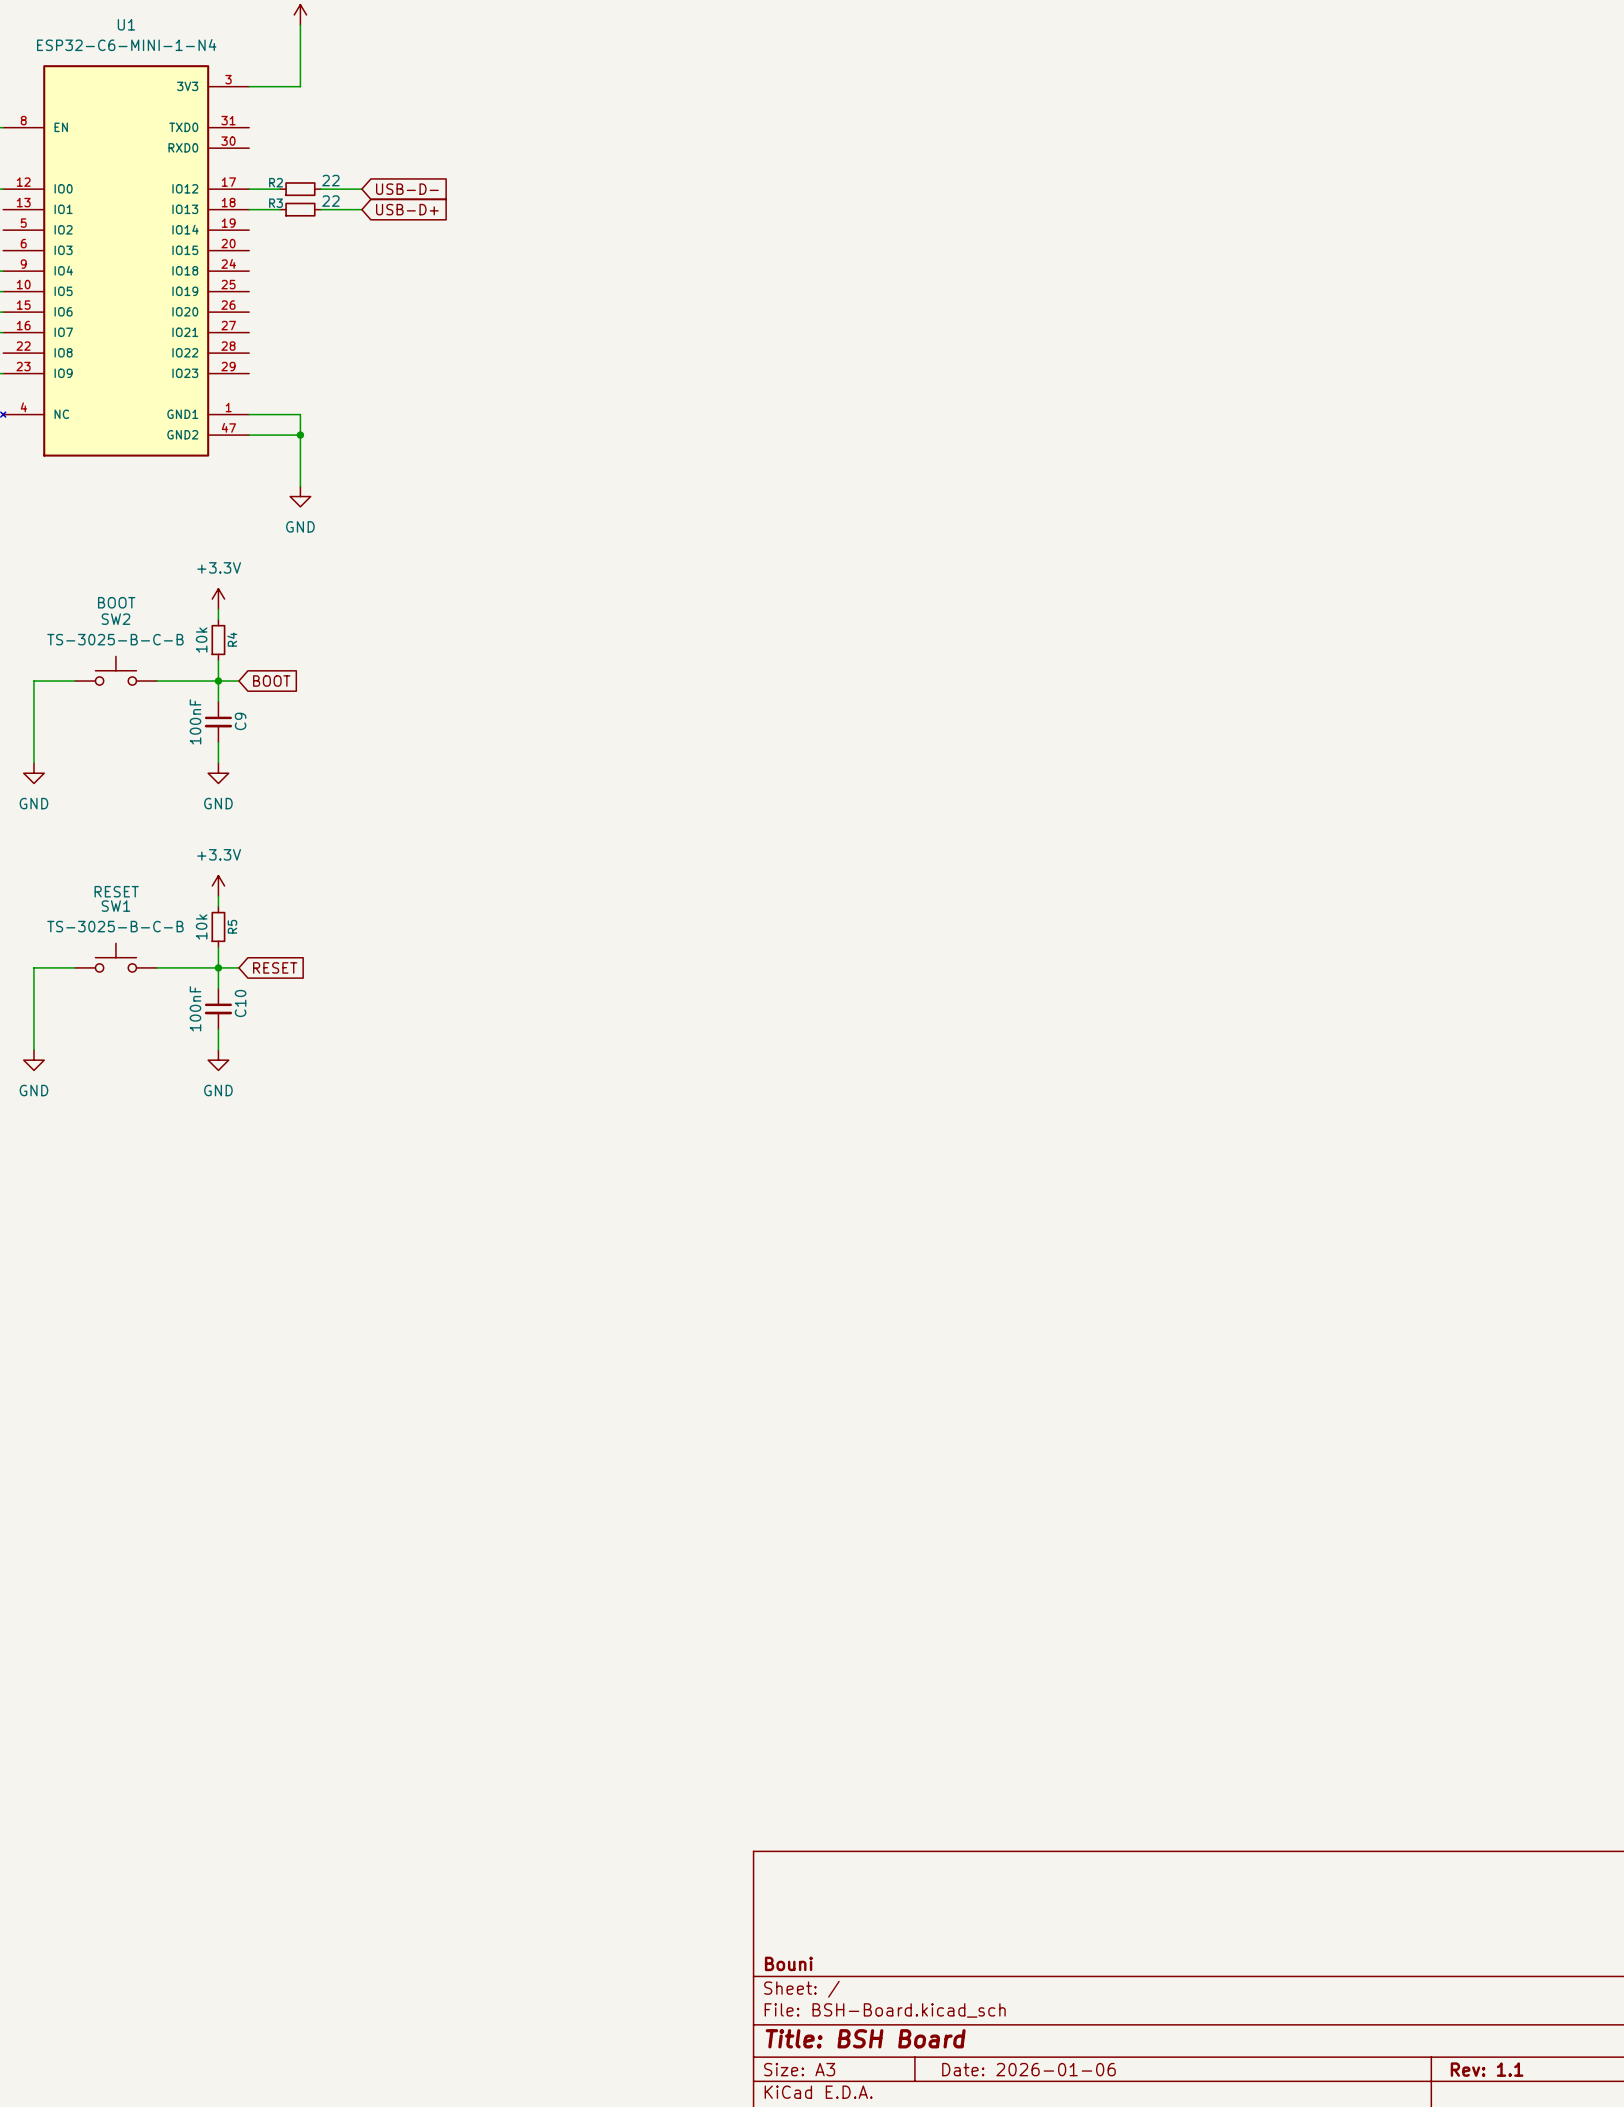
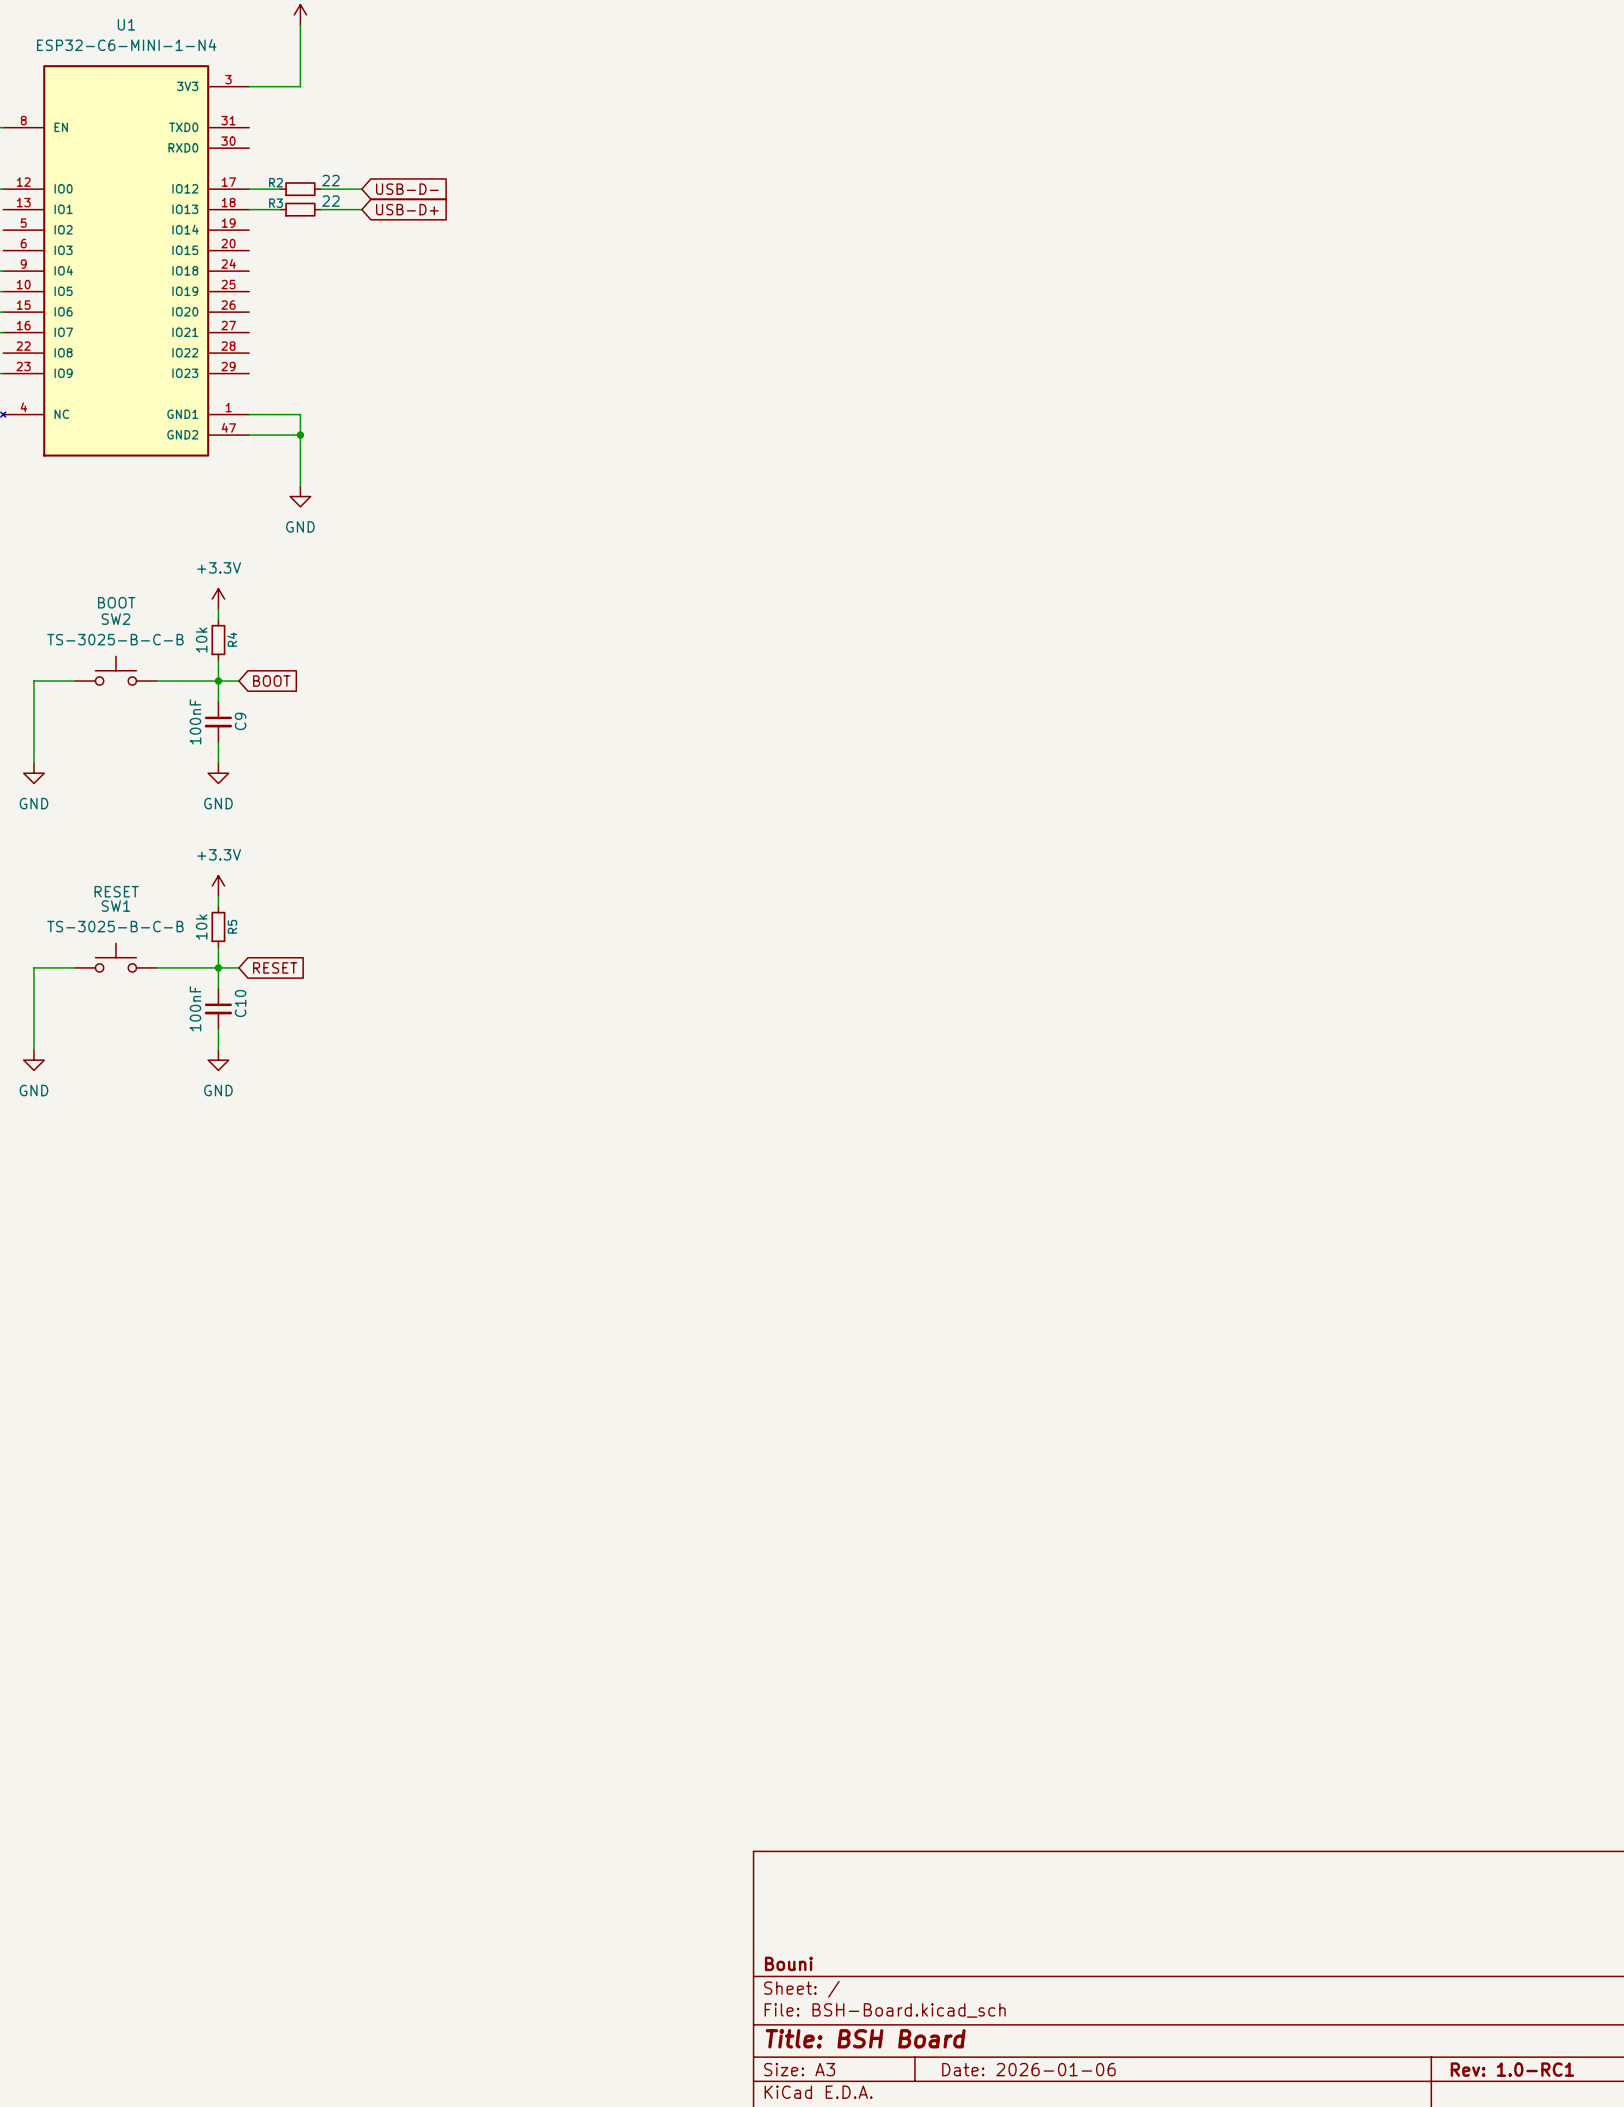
title block: Rev: 1.1 (1487, 2069) -> Rev: 1.0-RC1 (1512, 2069)

